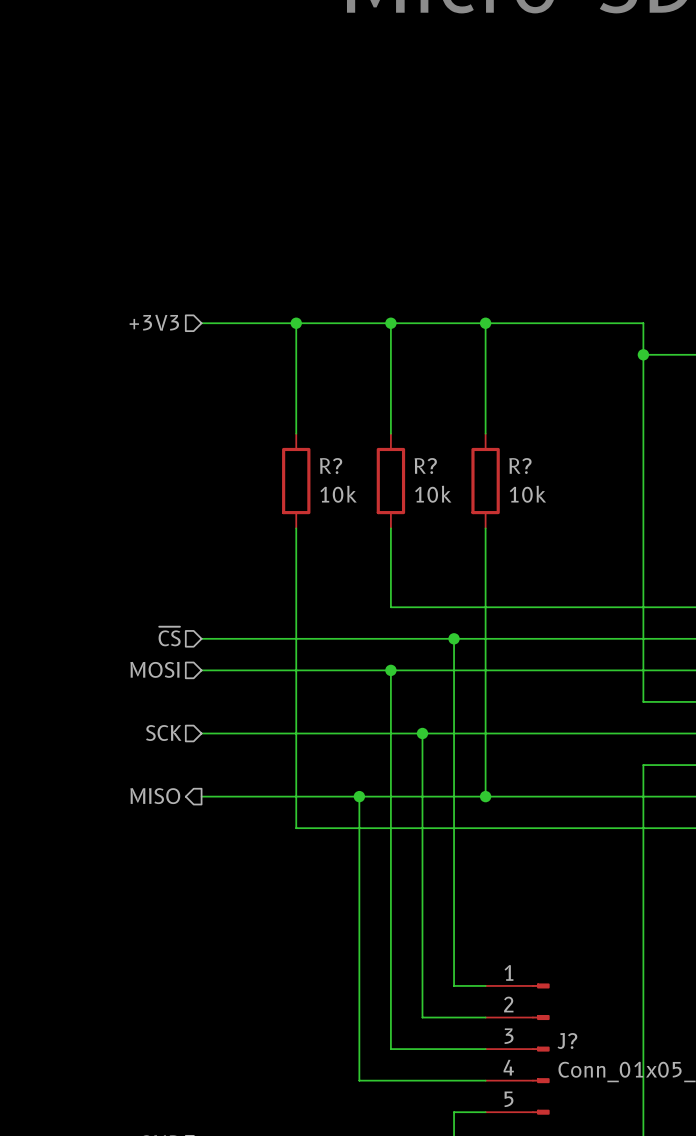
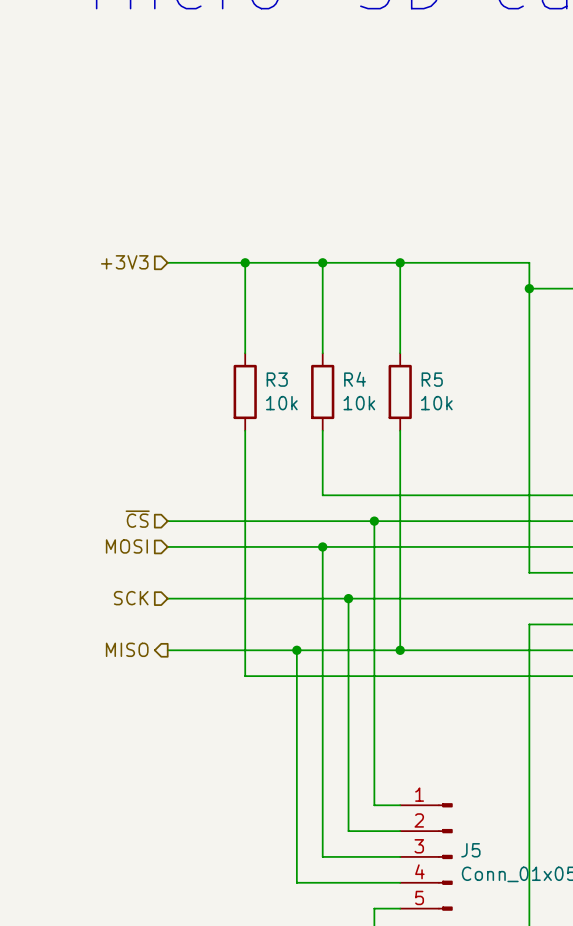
R? name: R? (331, 466) -> R3 (277, 379)
R? name: R? (425, 466) -> R4 (355, 379)
R? name: R? (520, 466) -> R5 (432, 379)
J? name: J? (567, 1041) -> J5 (470, 850)

